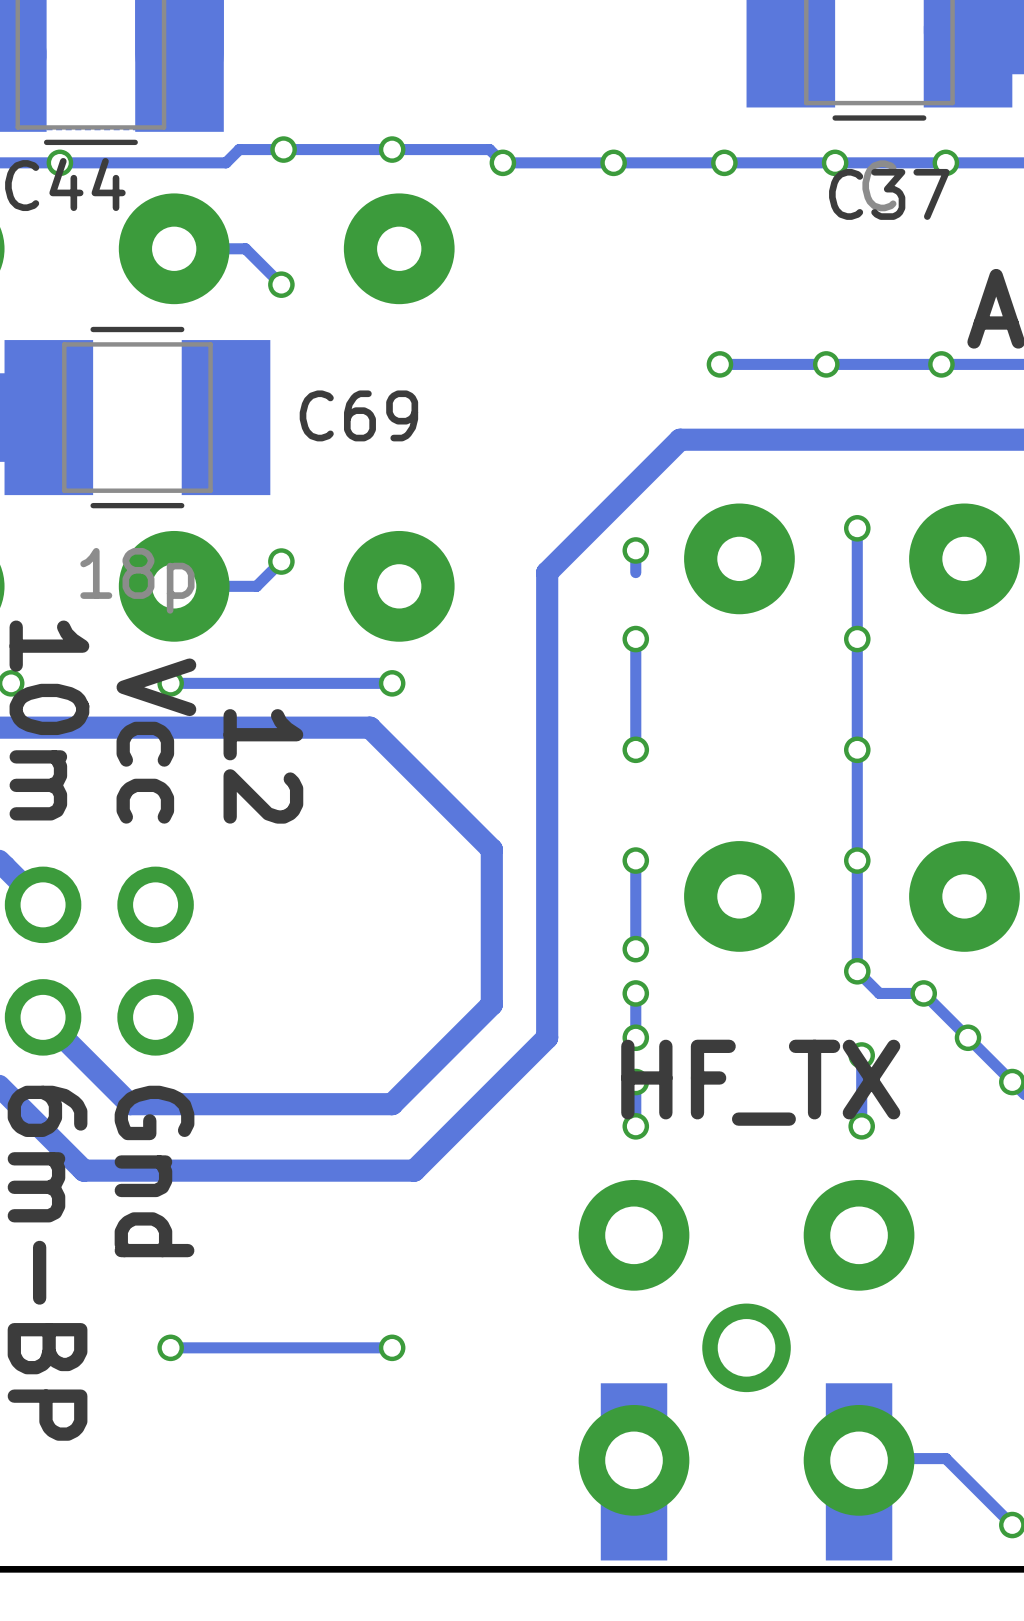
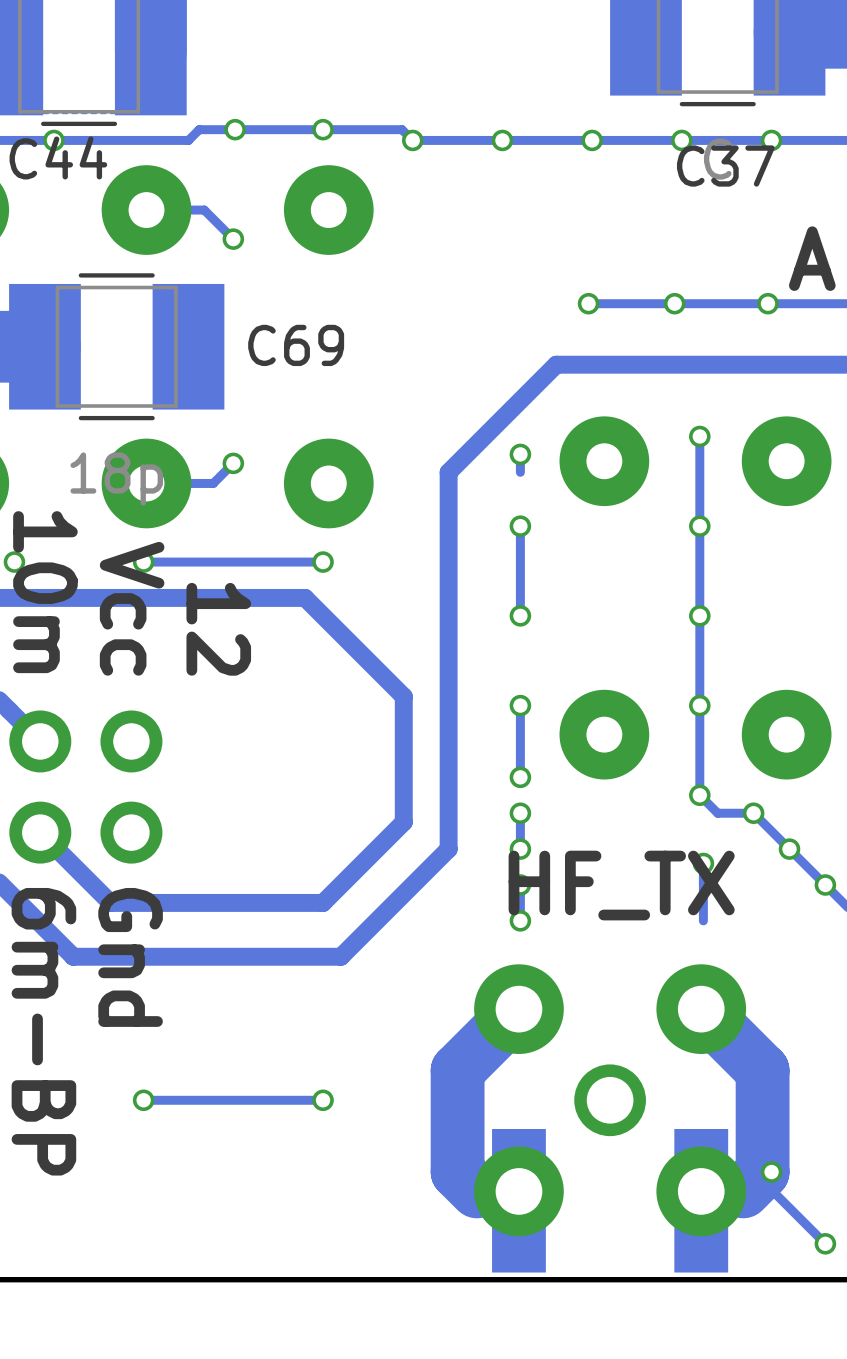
via: (861, 1126) -> none
track: none -> (518, 1009) (457, 1070) (457, 1172) (476, 1191)
track: none -> (701, 1009) (762, 1070) (762, 1172) (743, 1191)
via: none -> (771, 1172)

